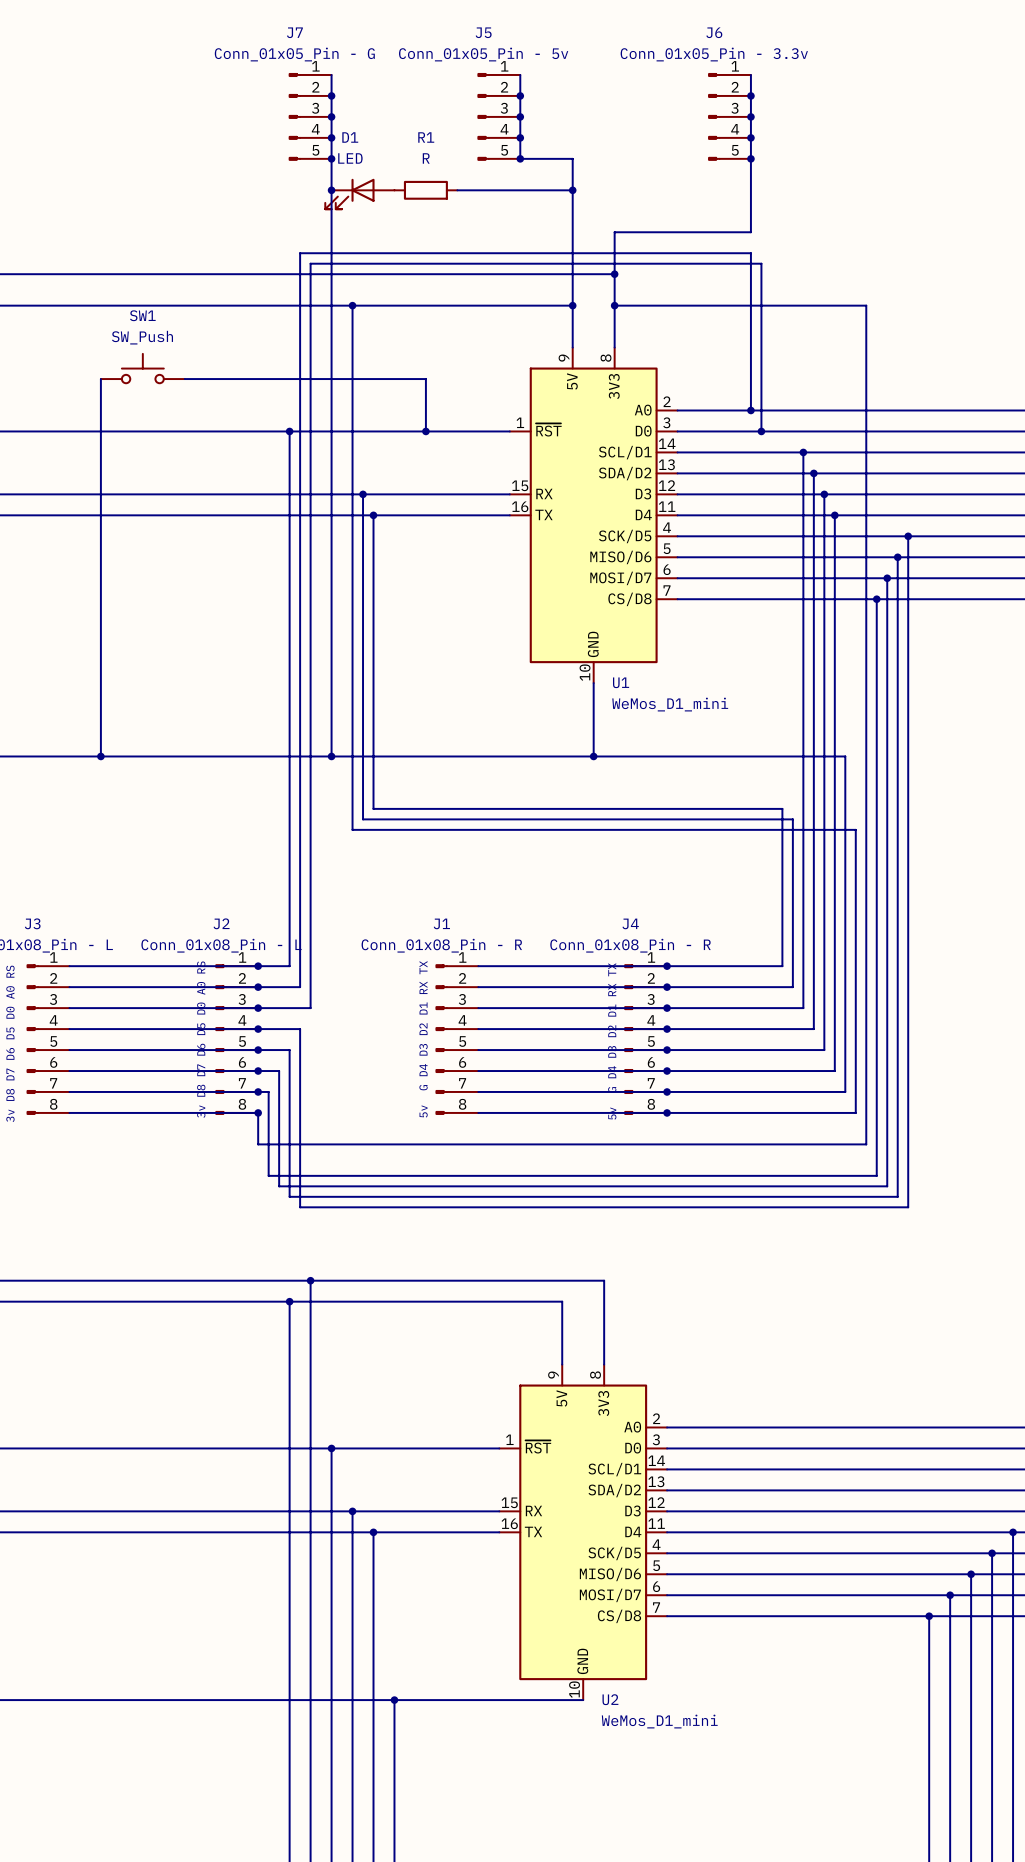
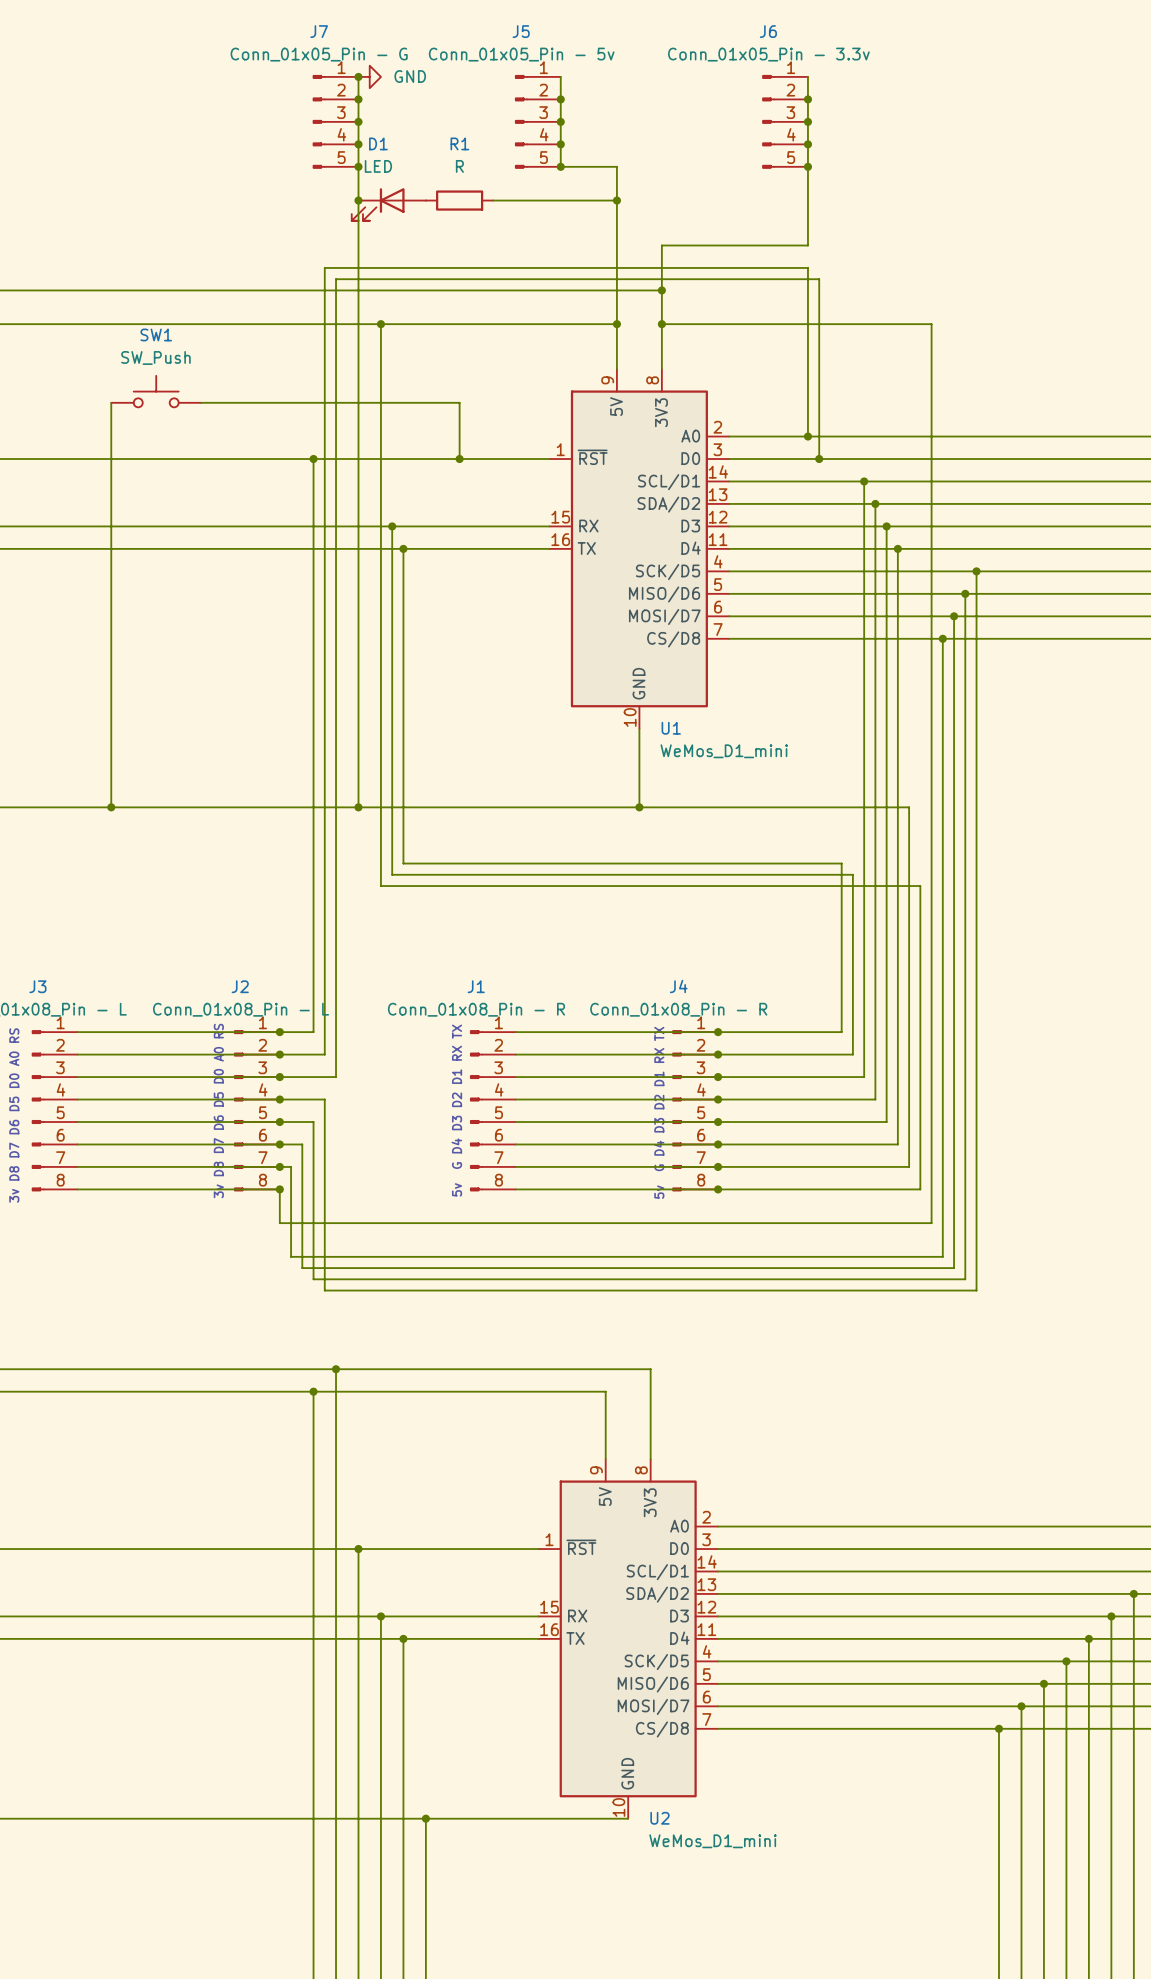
junction: none -> (358, 76)
power symbol: none -> GND (369, 76)

